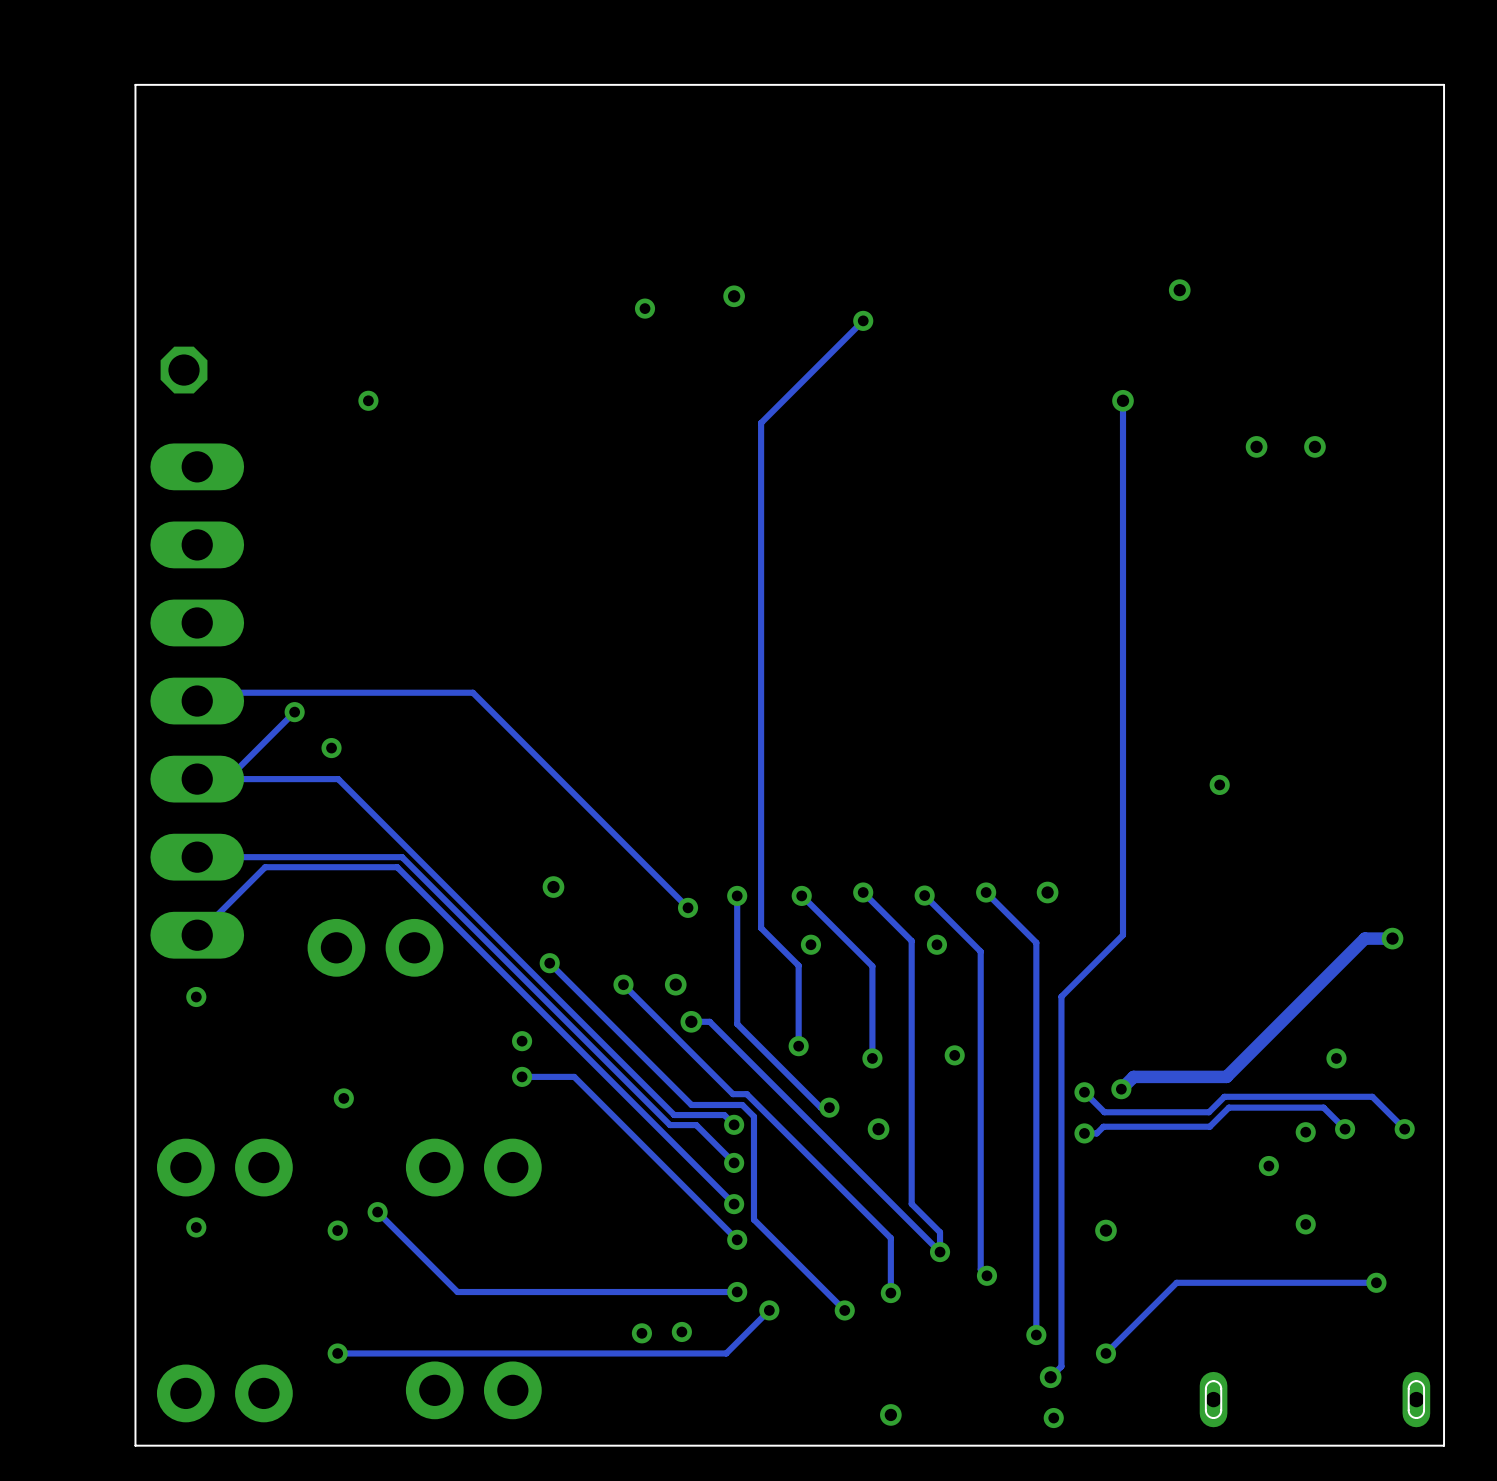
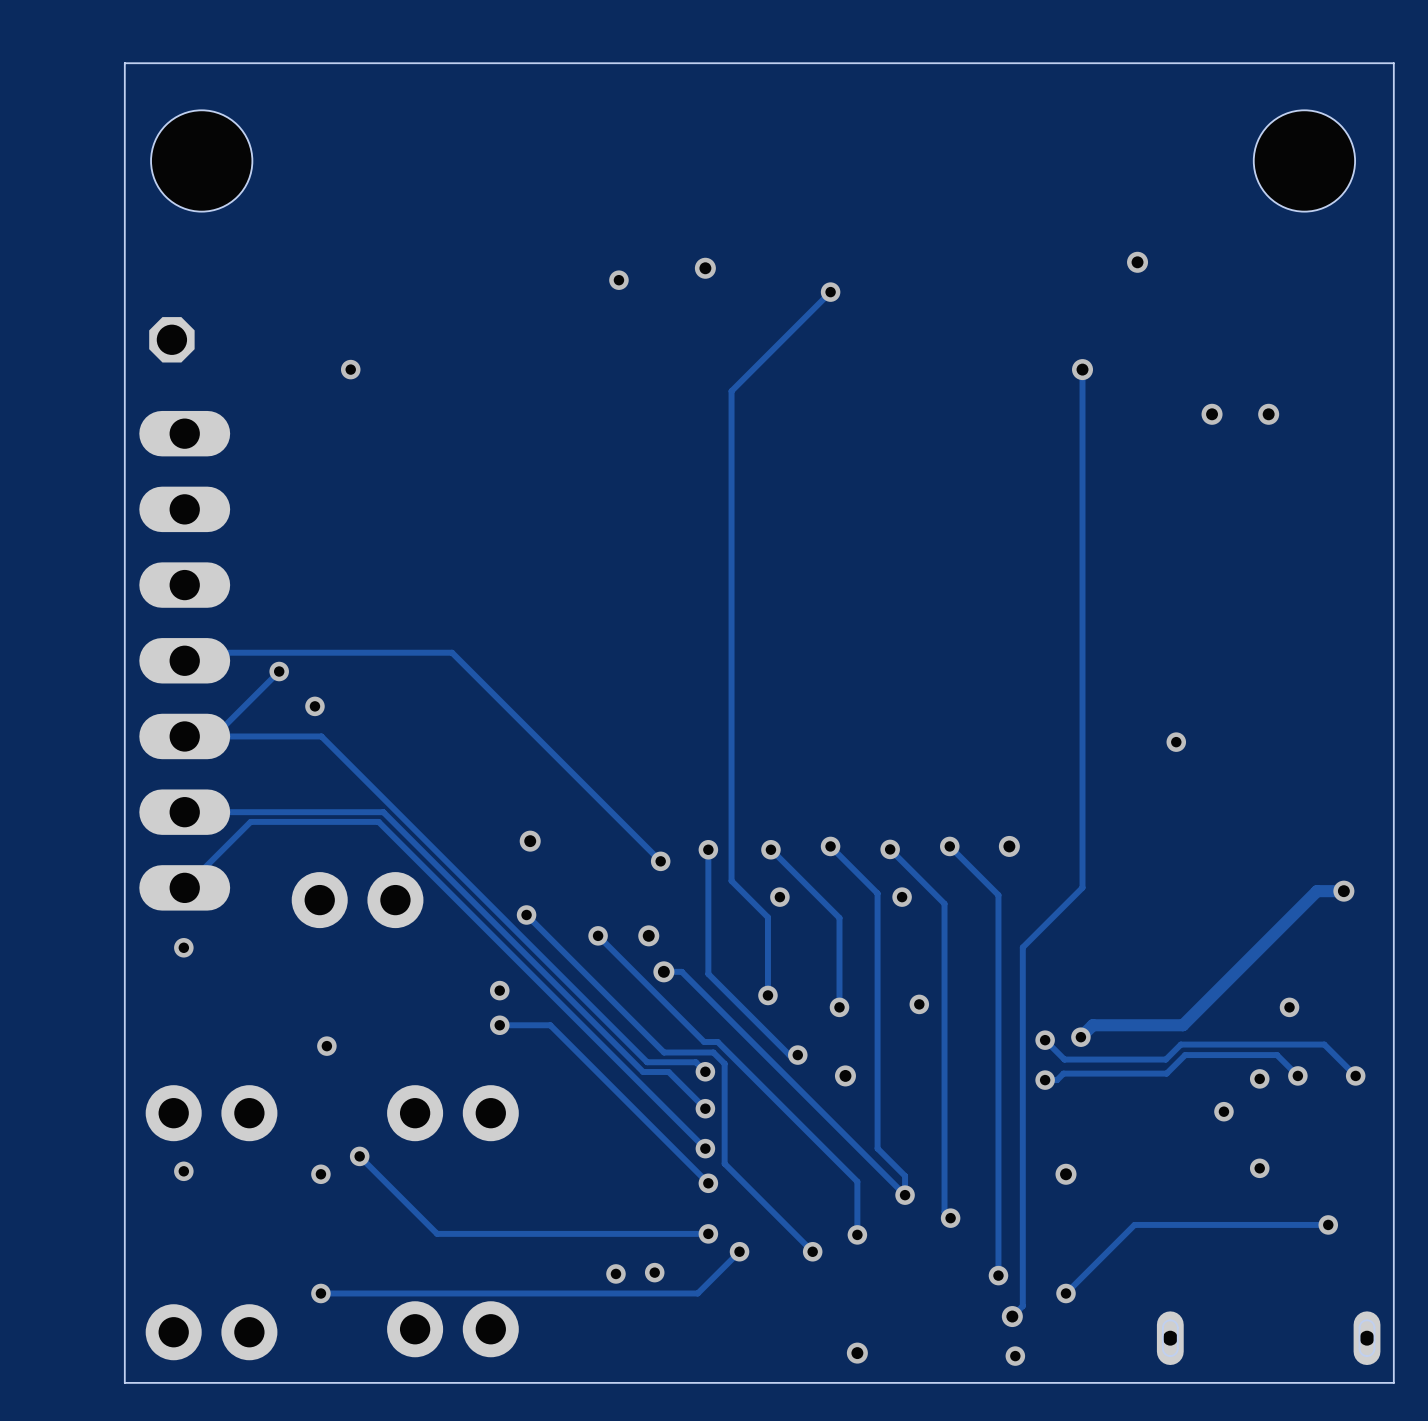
hole: none -> (201, 160)
hole: none -> (1304, 160)

